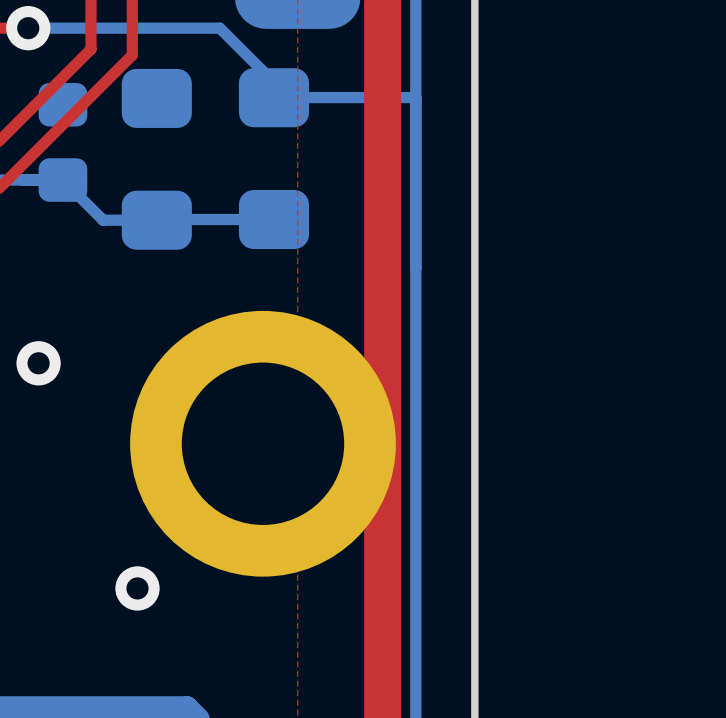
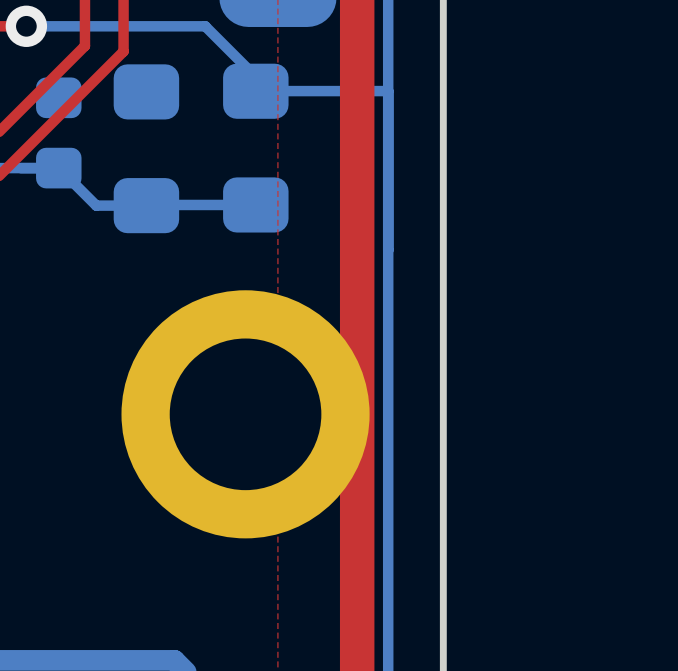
via: (38, 363) -> none
via: (137, 588) -> none

